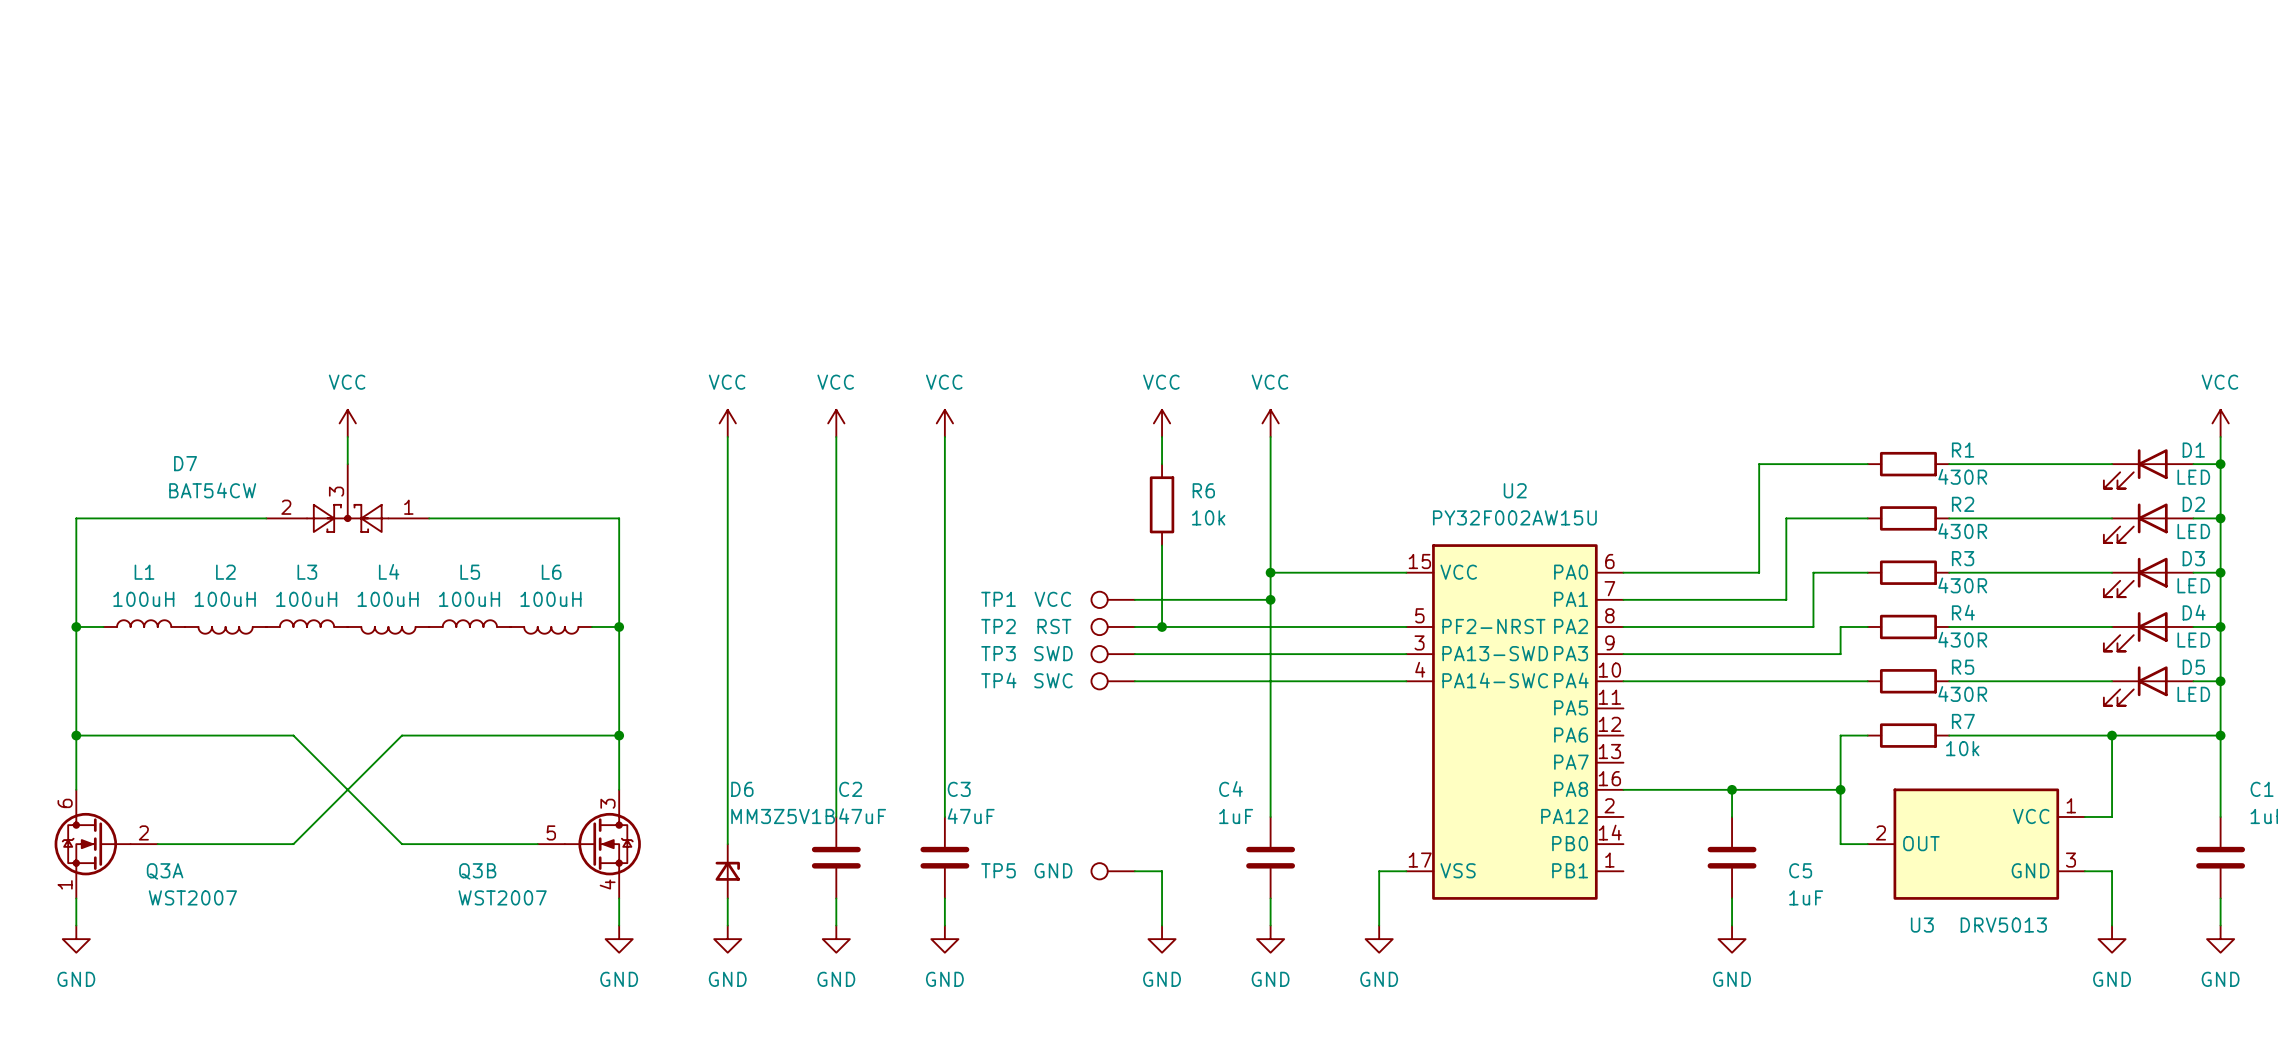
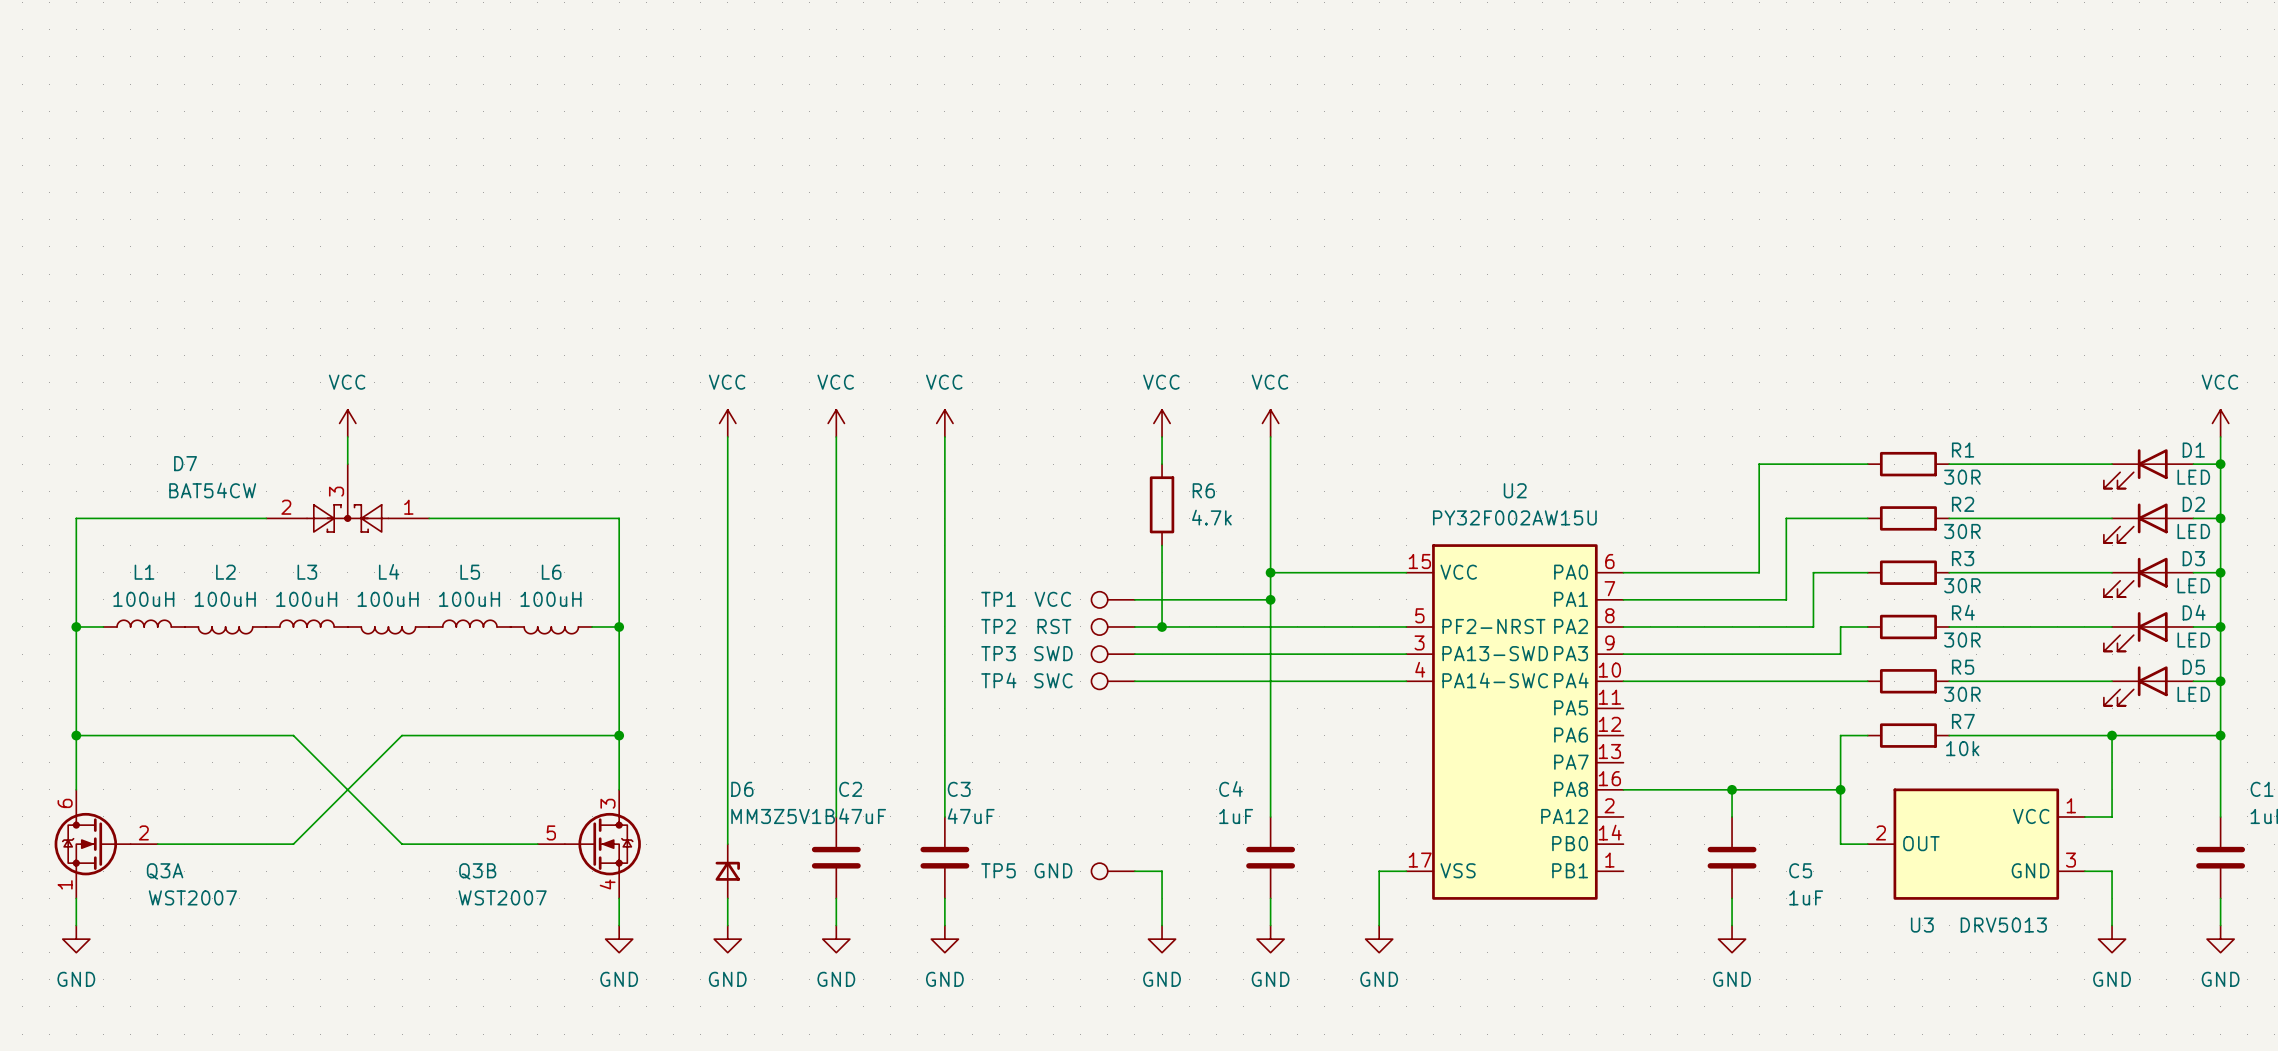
R1 value: 430R (1962, 476) -> 30R (1962, 477)
R6 value: 10k (1208, 517) -> 4.7k (1211, 517)
R2 value: 430R (1962, 531) -> 30R (1962, 531)
R3 value: 430R (1962, 585) -> 30R (1962, 585)
R4 value: 430R (1962, 639) -> 30R (1962, 640)
R5 value: 430R (1962, 694) -> 30R (1962, 694)

